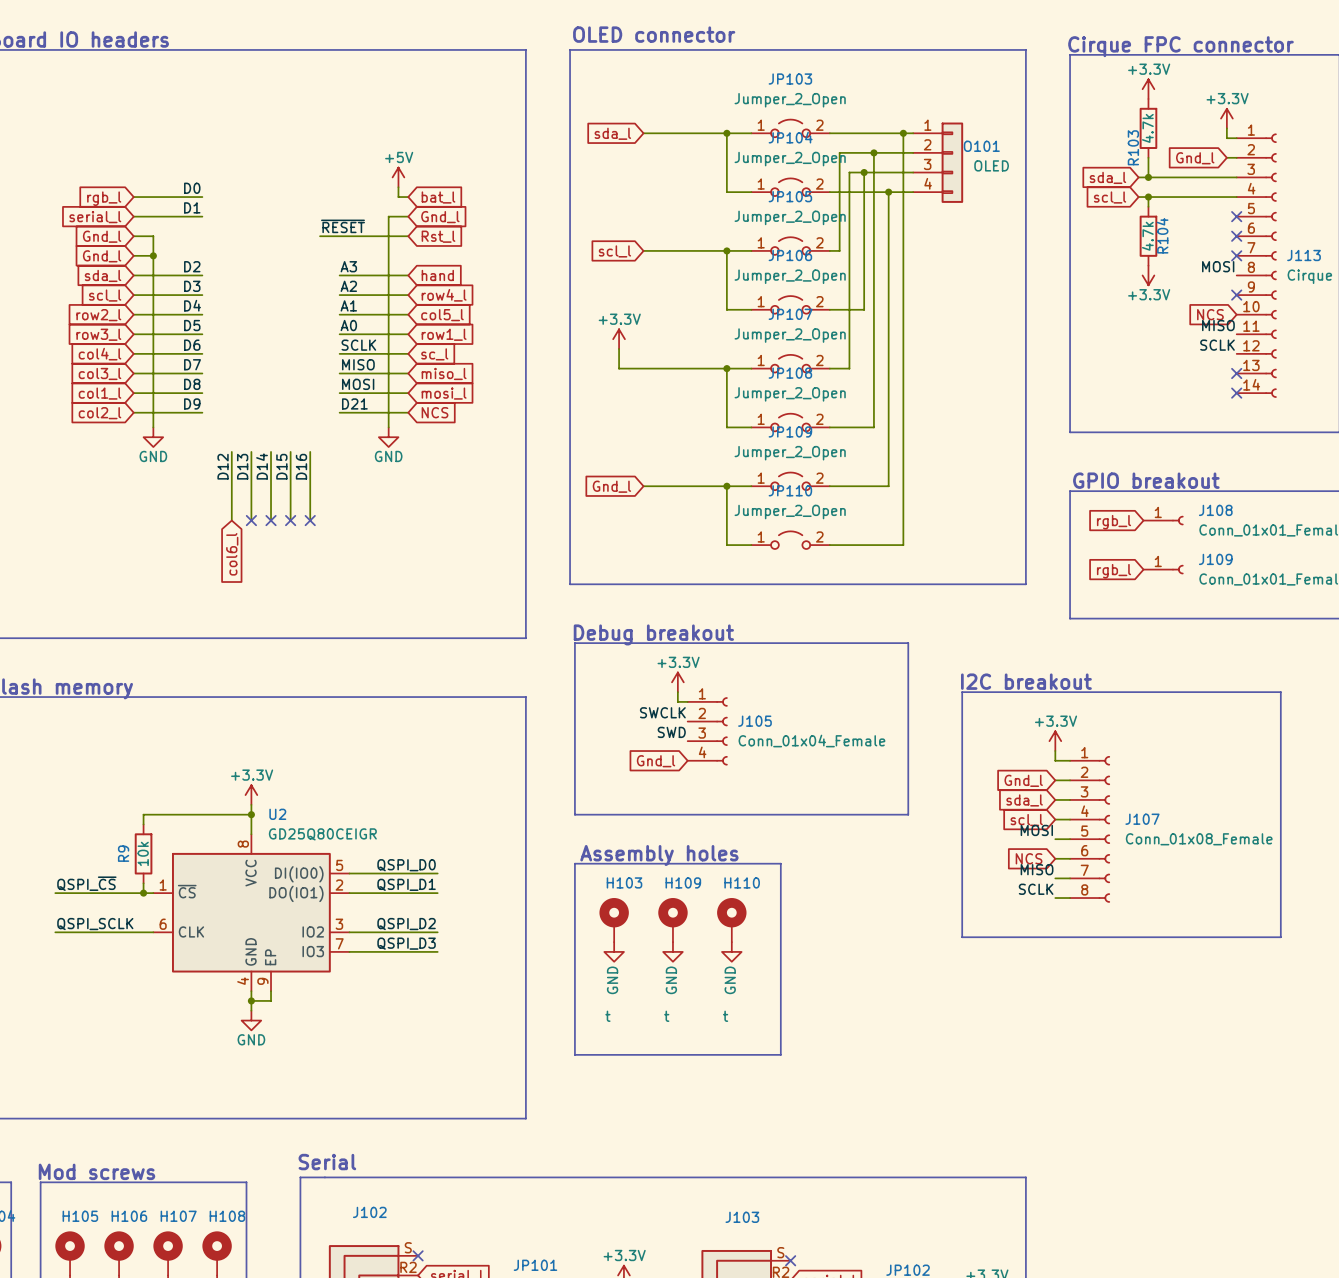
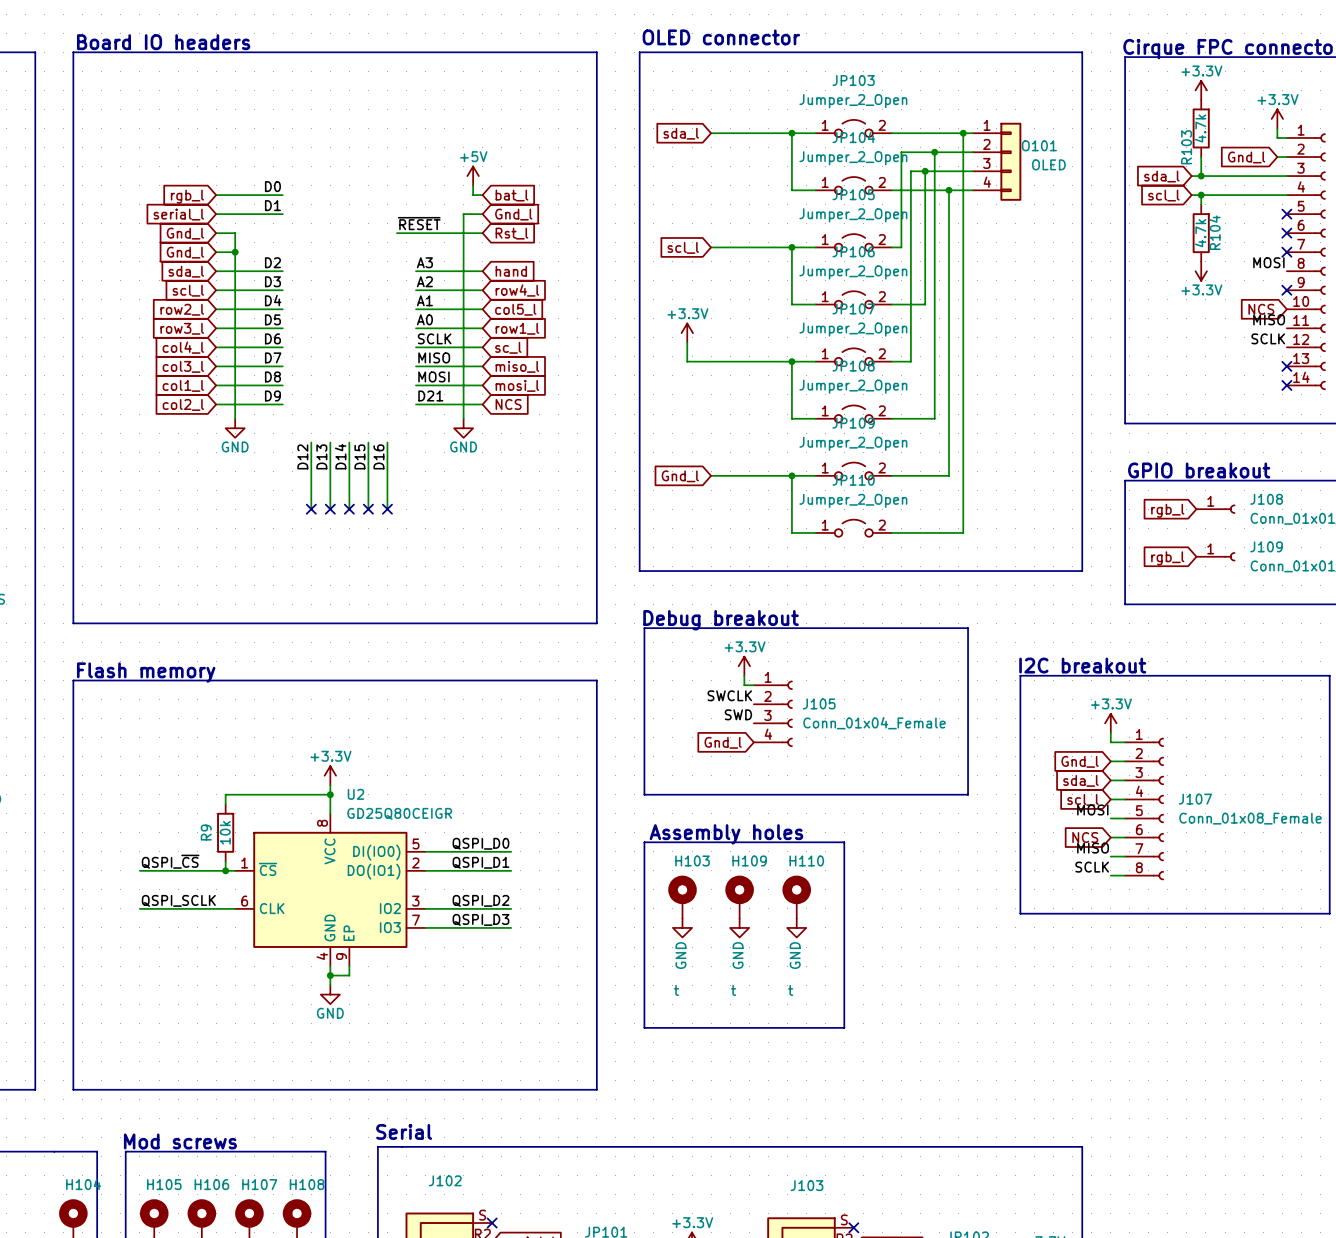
no-connect mark: none -> (311, 509)
global label: col6_l (232, 554) -> none

